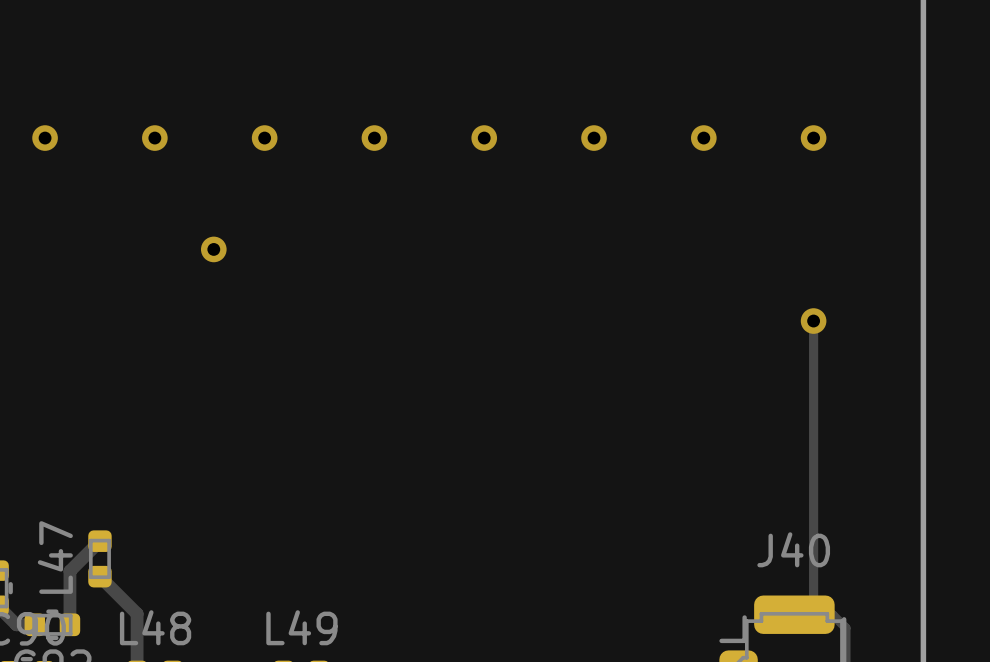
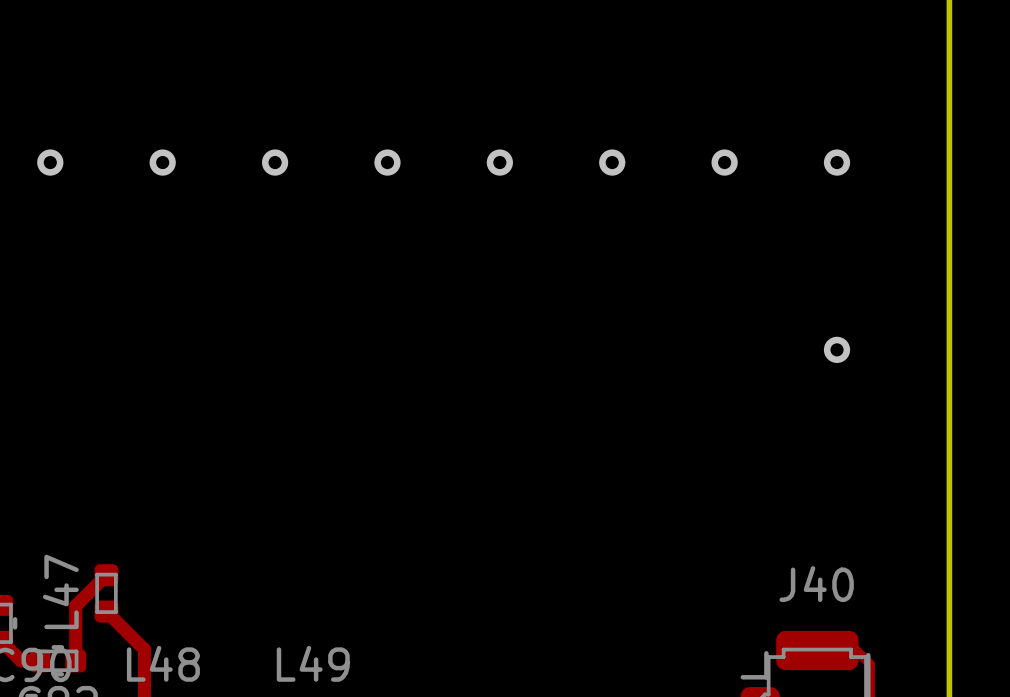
via: (213, 249) -> none
track: (813, 321) (813, 614) -> none

